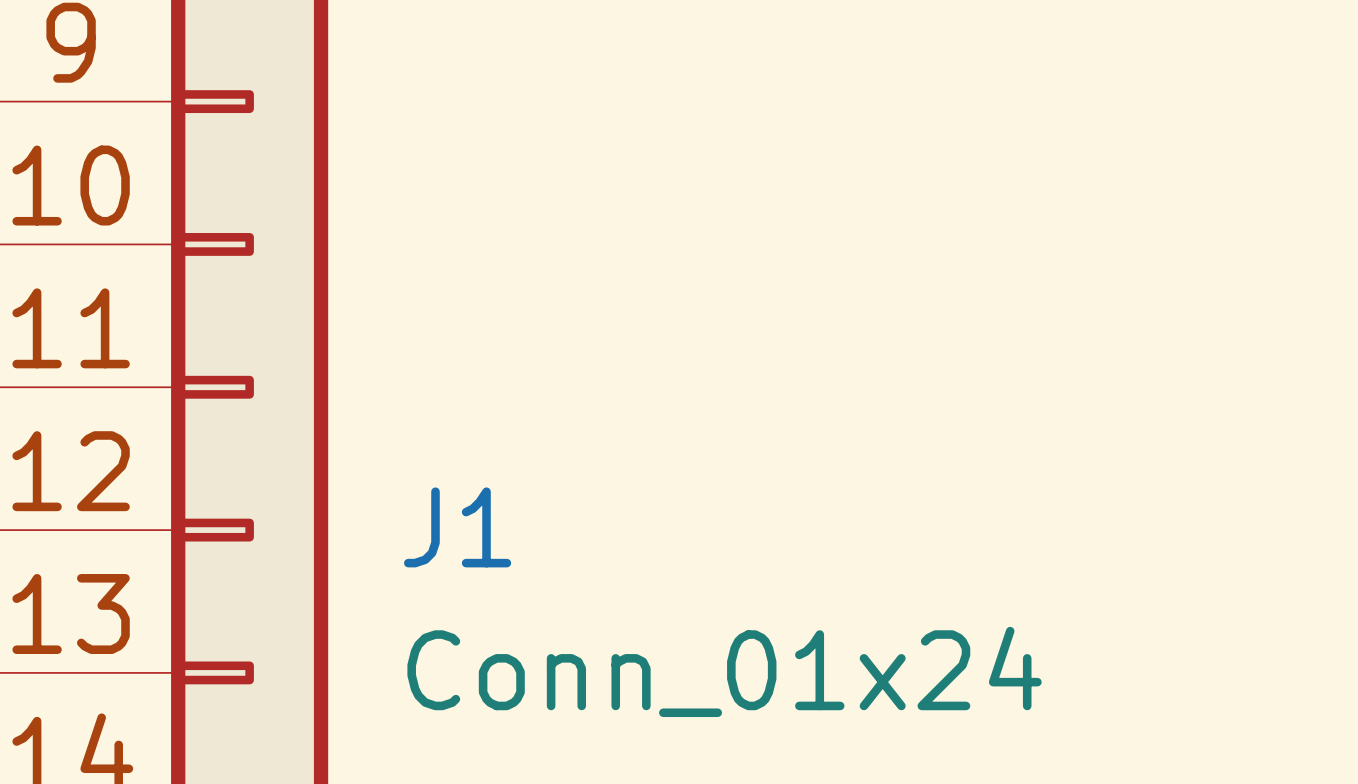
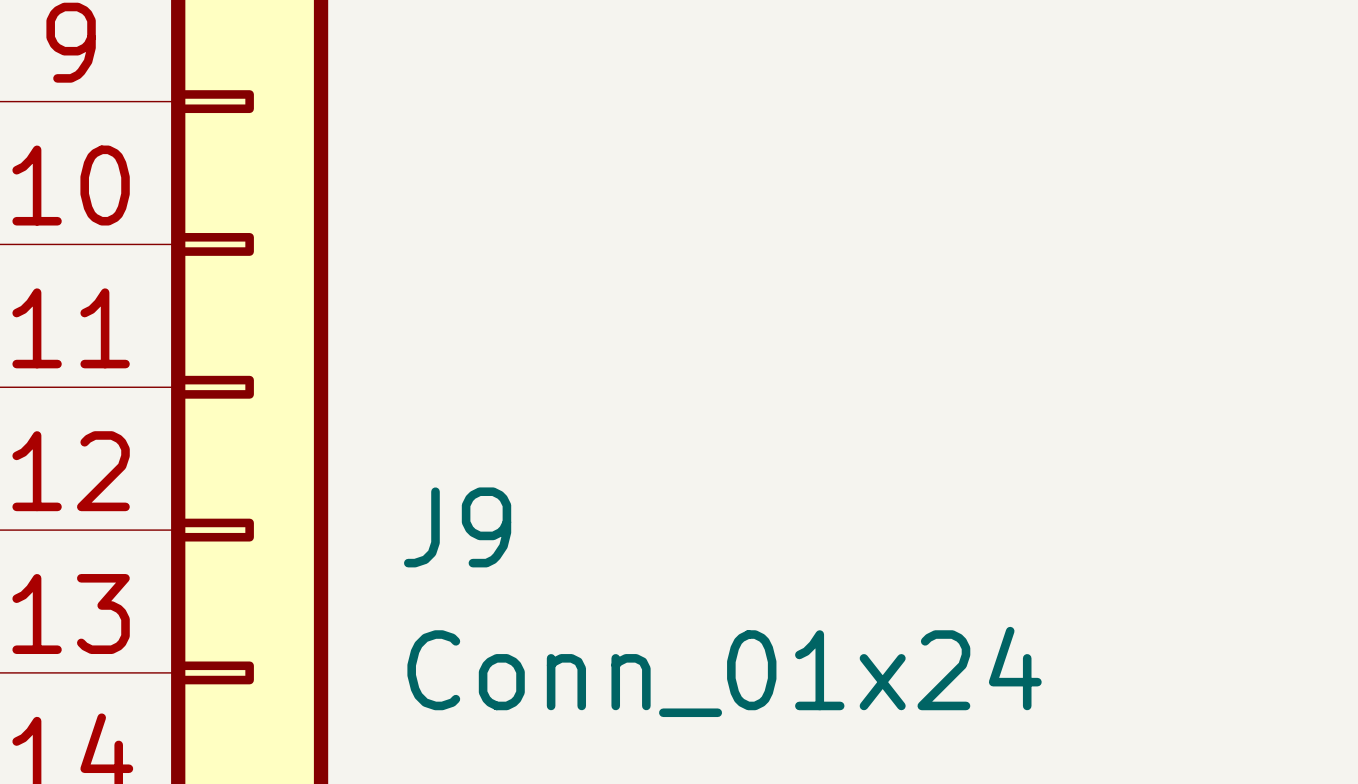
J1 name: J1 (457, 527) -> J9 (457, 527)

